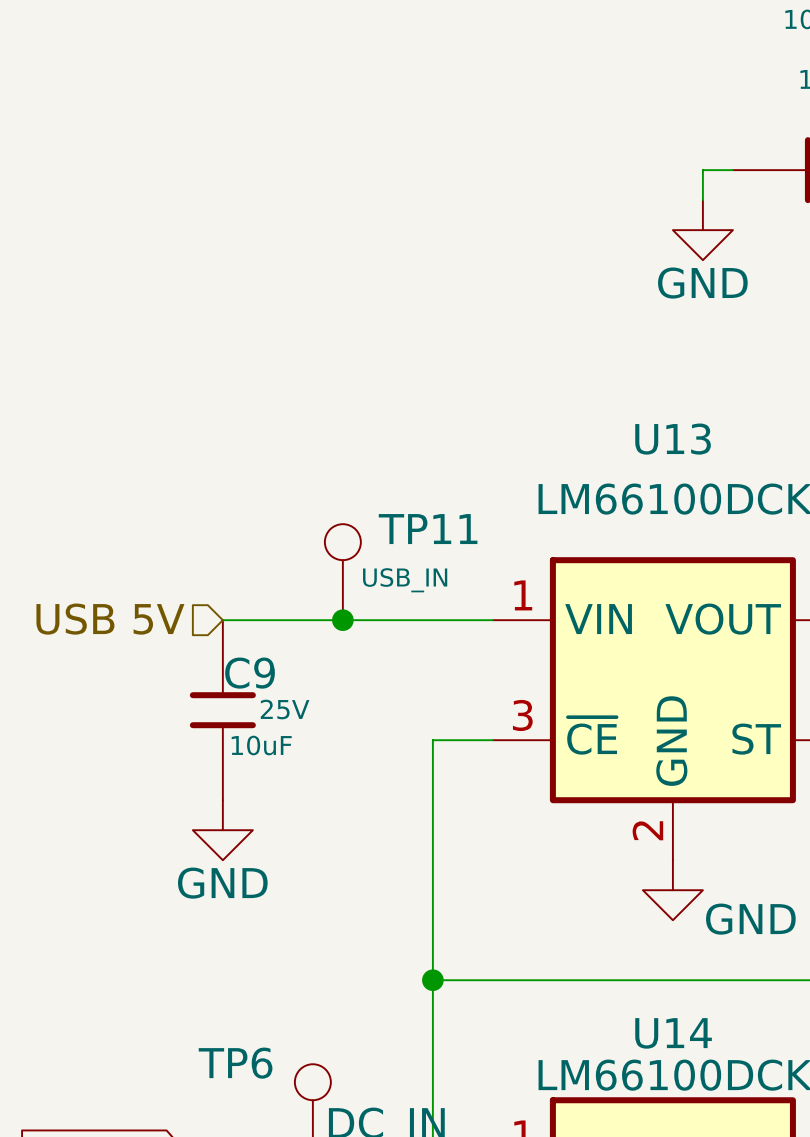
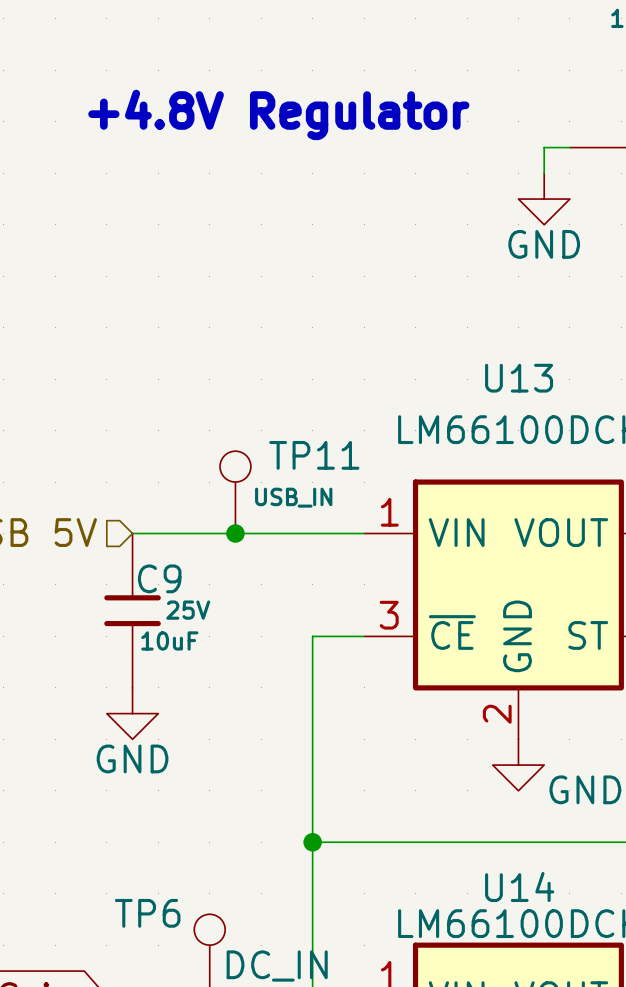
text: none -> +4.8V Regulator (278, 114)

